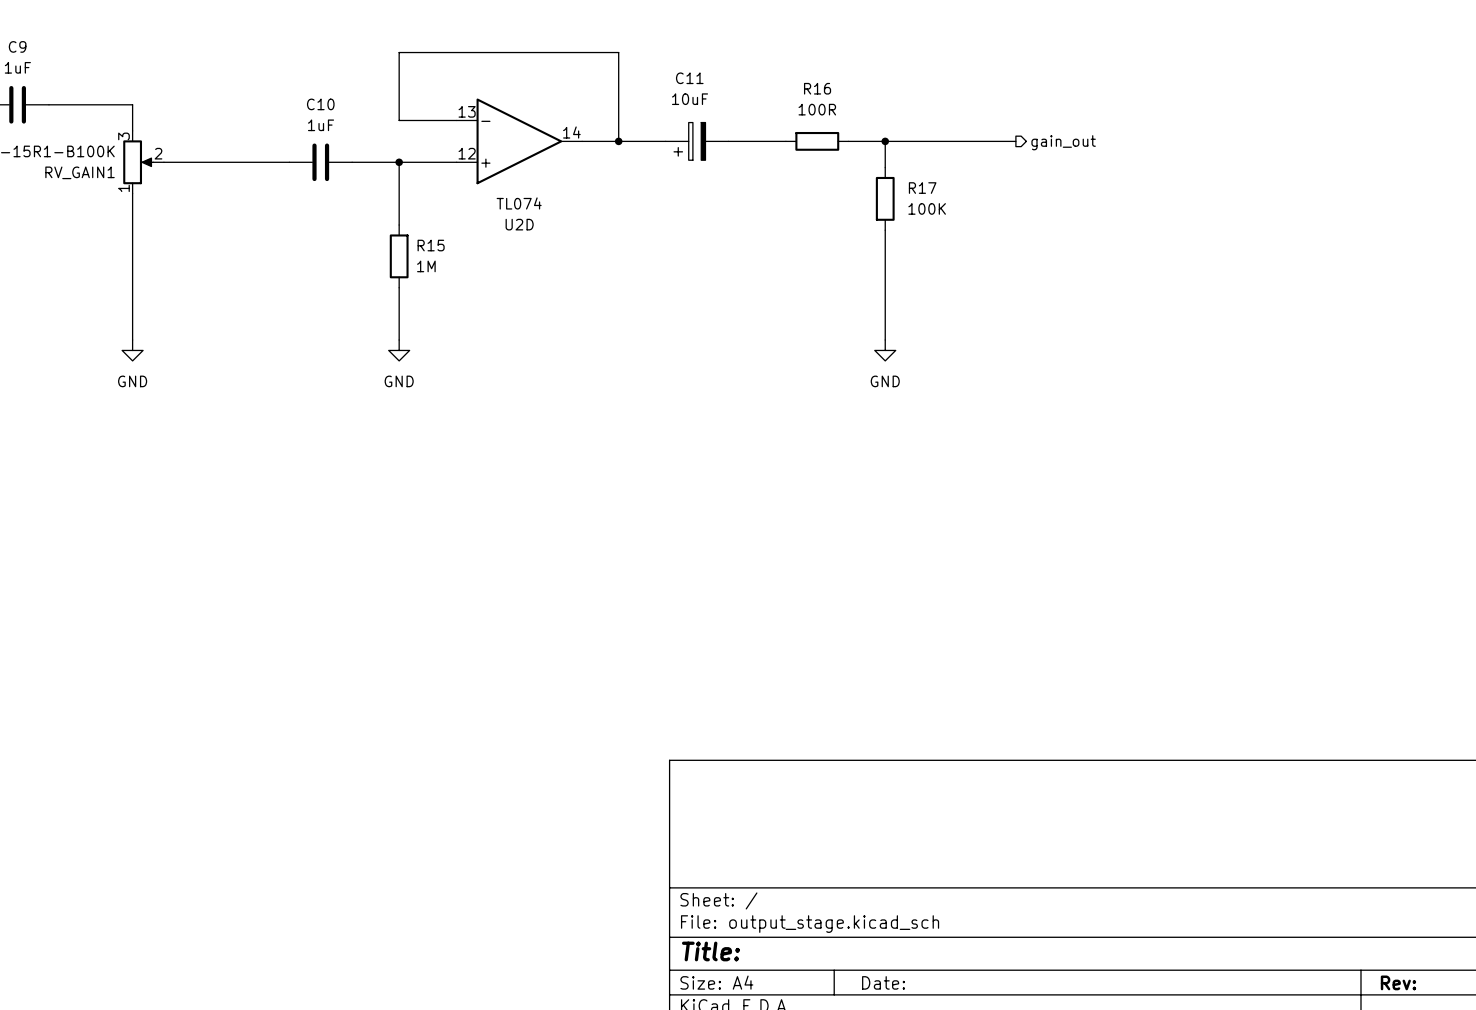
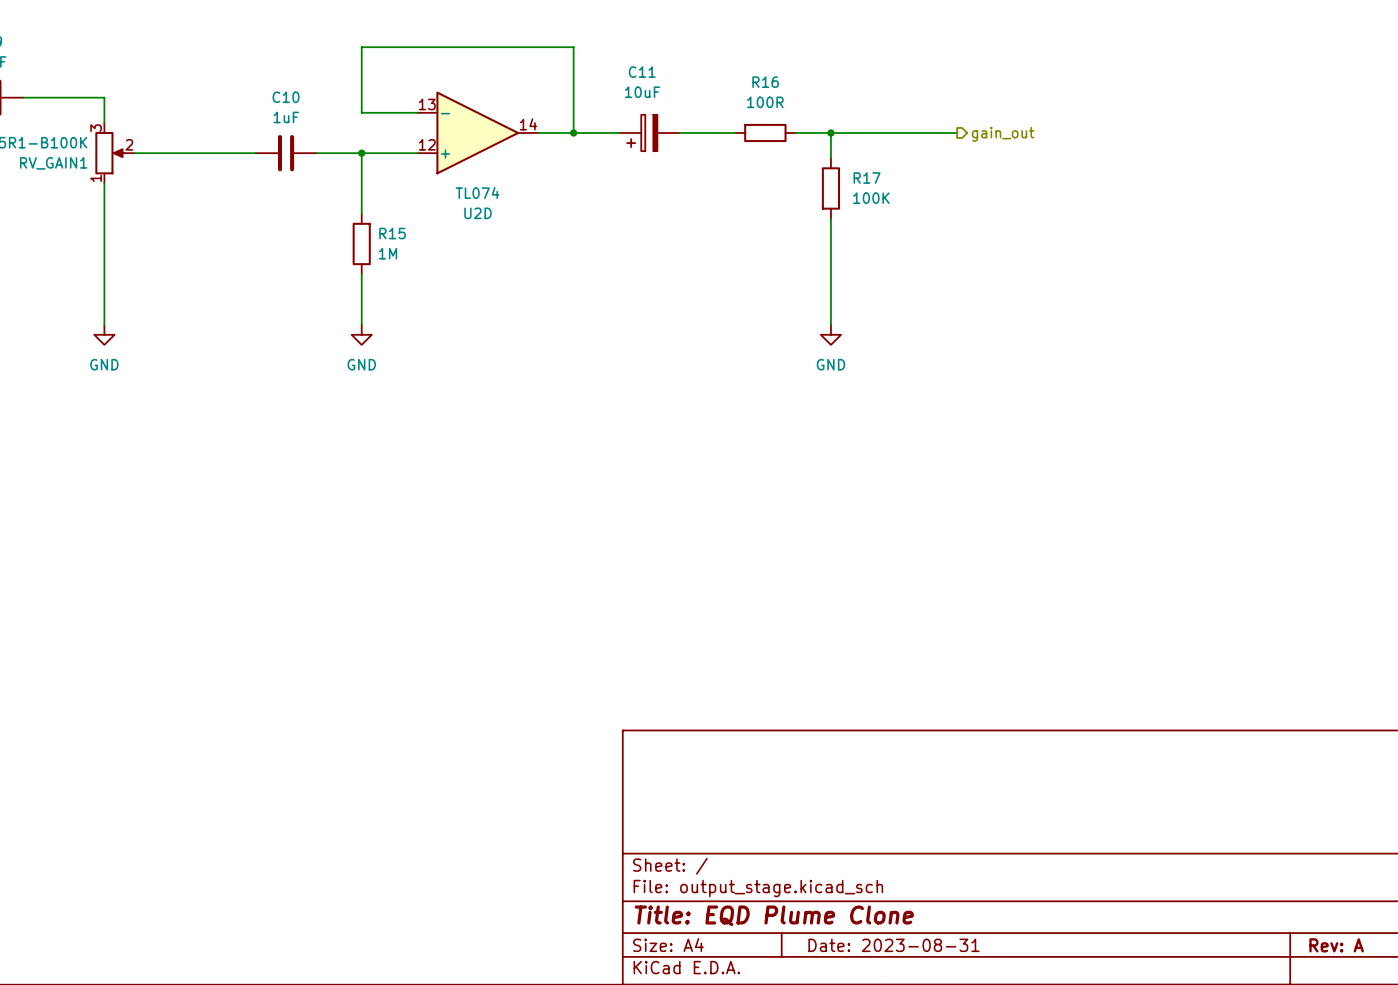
title block: Title: (711, 951) -> Title: EQD Plume Clone (774, 915)
title block: Date: (883, 982) -> Date: 2023-08-31 (894, 945)
title block: Rev: (1398, 982) -> Rev: A (1336, 945)

